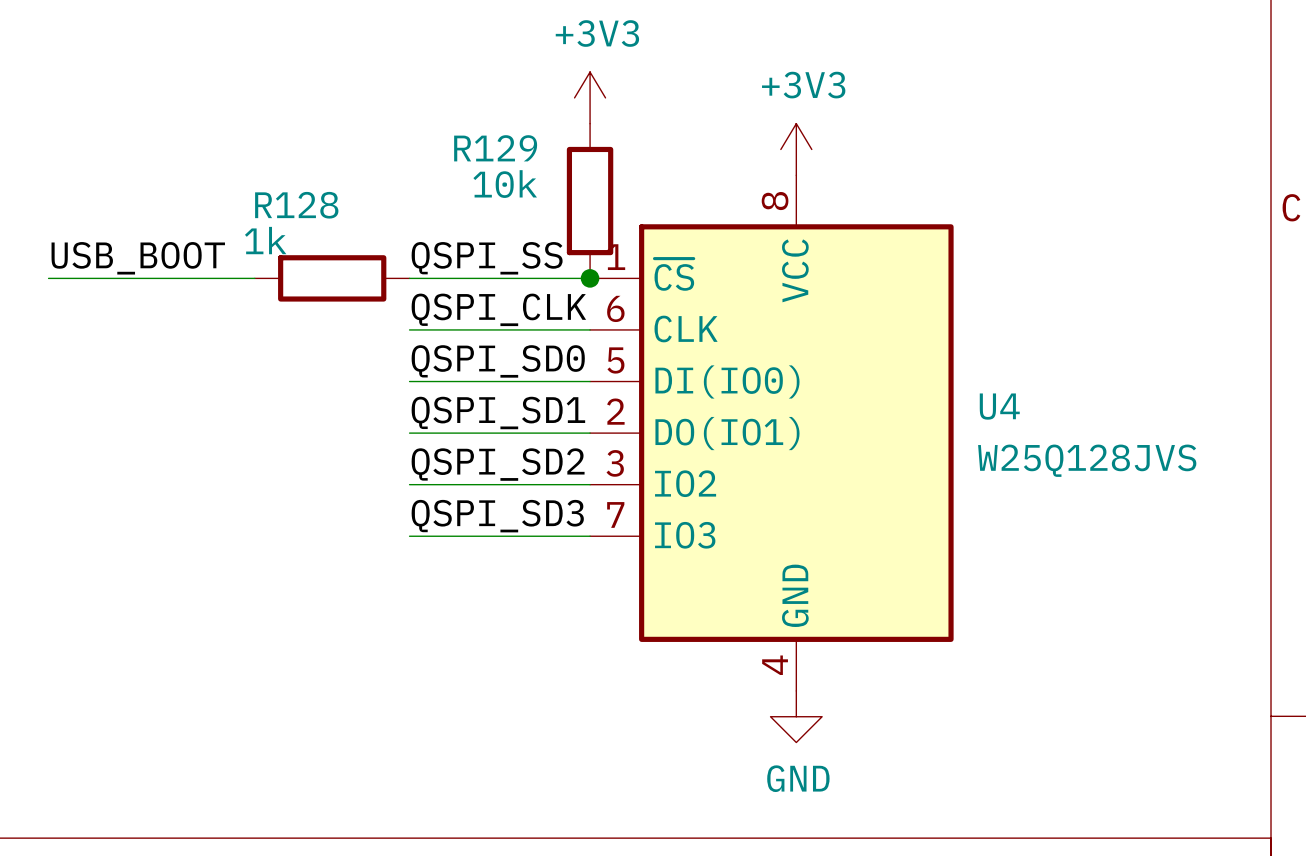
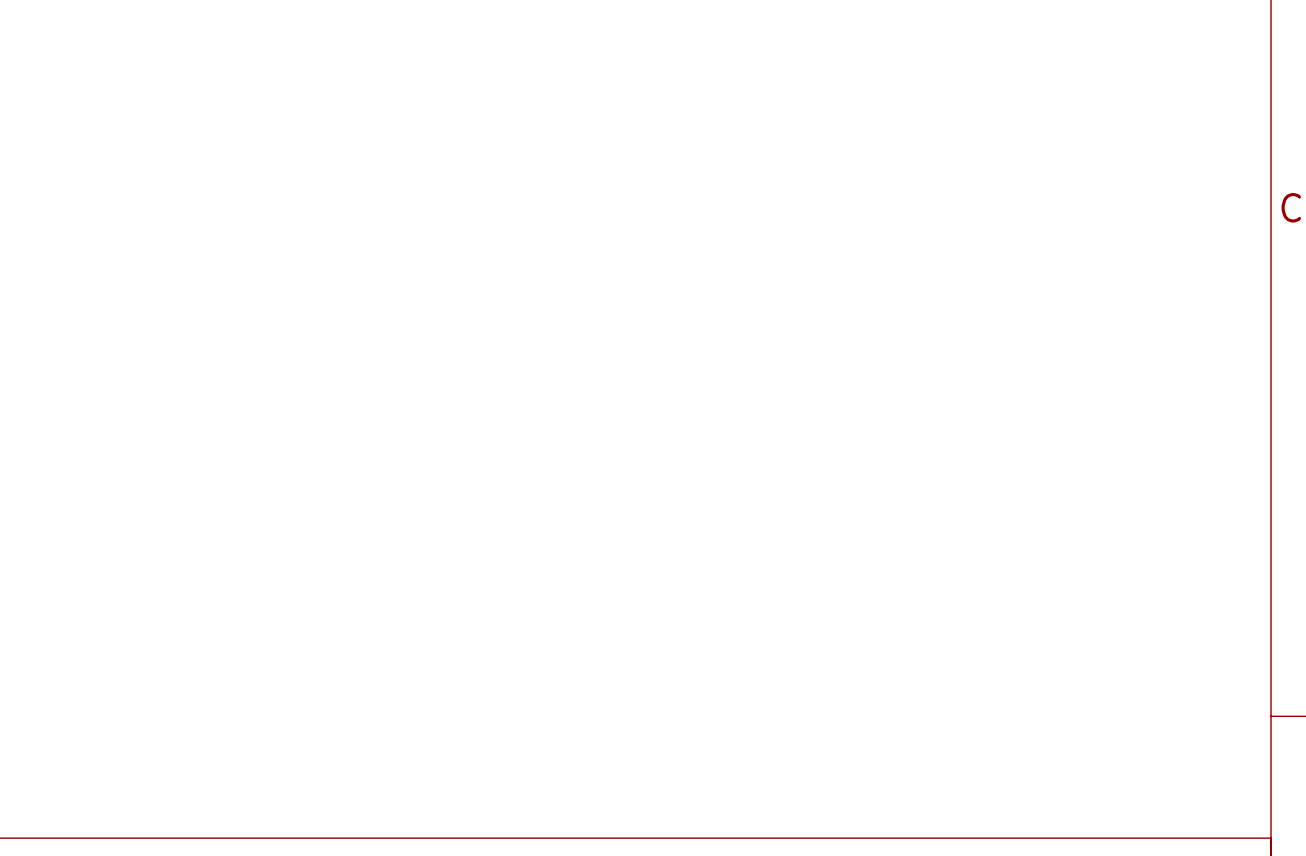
power symbol: +3V3 (590, 97) -> none
power symbol: +3V3 (796, 149) -> none
R129: 10k (590, 201) -> none
label: USB_BOOT (138, 258) -> none
label: QSPI_SS (487, 258) -> none
wire: (48, 278) (254, 278) -> none
R128: 1k (332, 278) -> none
wire: (409, 278) (590, 278) -> none
junction: (590, 278) -> none
label: QSPI_CLK (498, 309) -> none
wire: (409, 329) (590, 329) -> none
label: QSPI_SD0 (498, 361) -> none
wire: (409, 381) (590, 381) -> none
label: QSPI_SD1 (498, 412) -> none
wire: (409, 433) (590, 433) -> none
U4: W25Q128JVS (771, 433) -> none
label: QSPI_SD2 (498, 464) -> none
wire: (409, 484) (590, 484) -> none
label: QSPI_SD3 (497, 516) -> none
wire: (409, 536) (590, 536) -> none
power symbol: GND (796, 716) -> none

